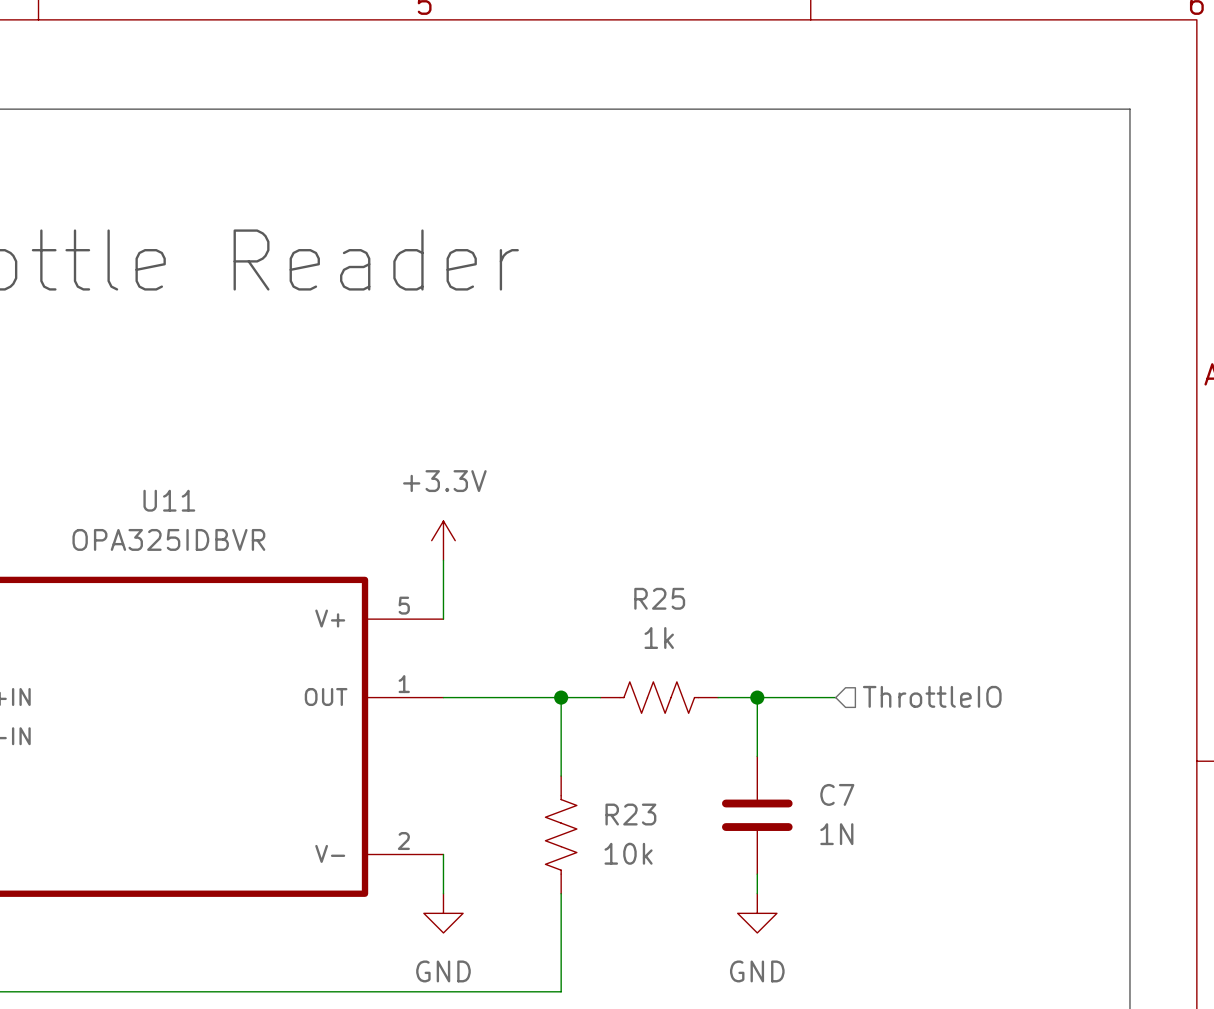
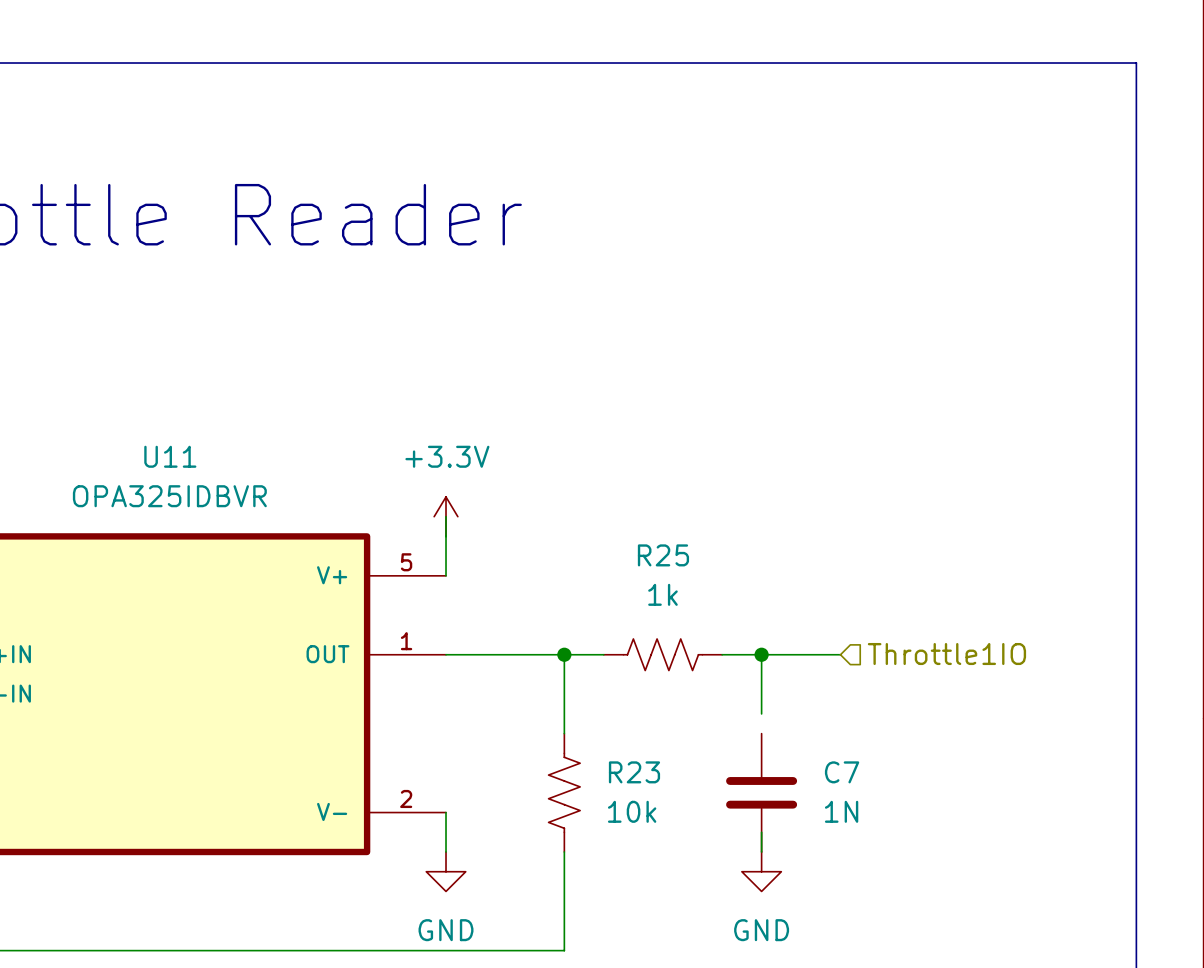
power symbol position: +3.3V (443, 540) -> +3.3V (446, 516)
hierarchical label: ThrottleIO (932, 696) -> Throttle1IO (946, 654)
C7 position: (757, 815) -> (761, 792)

